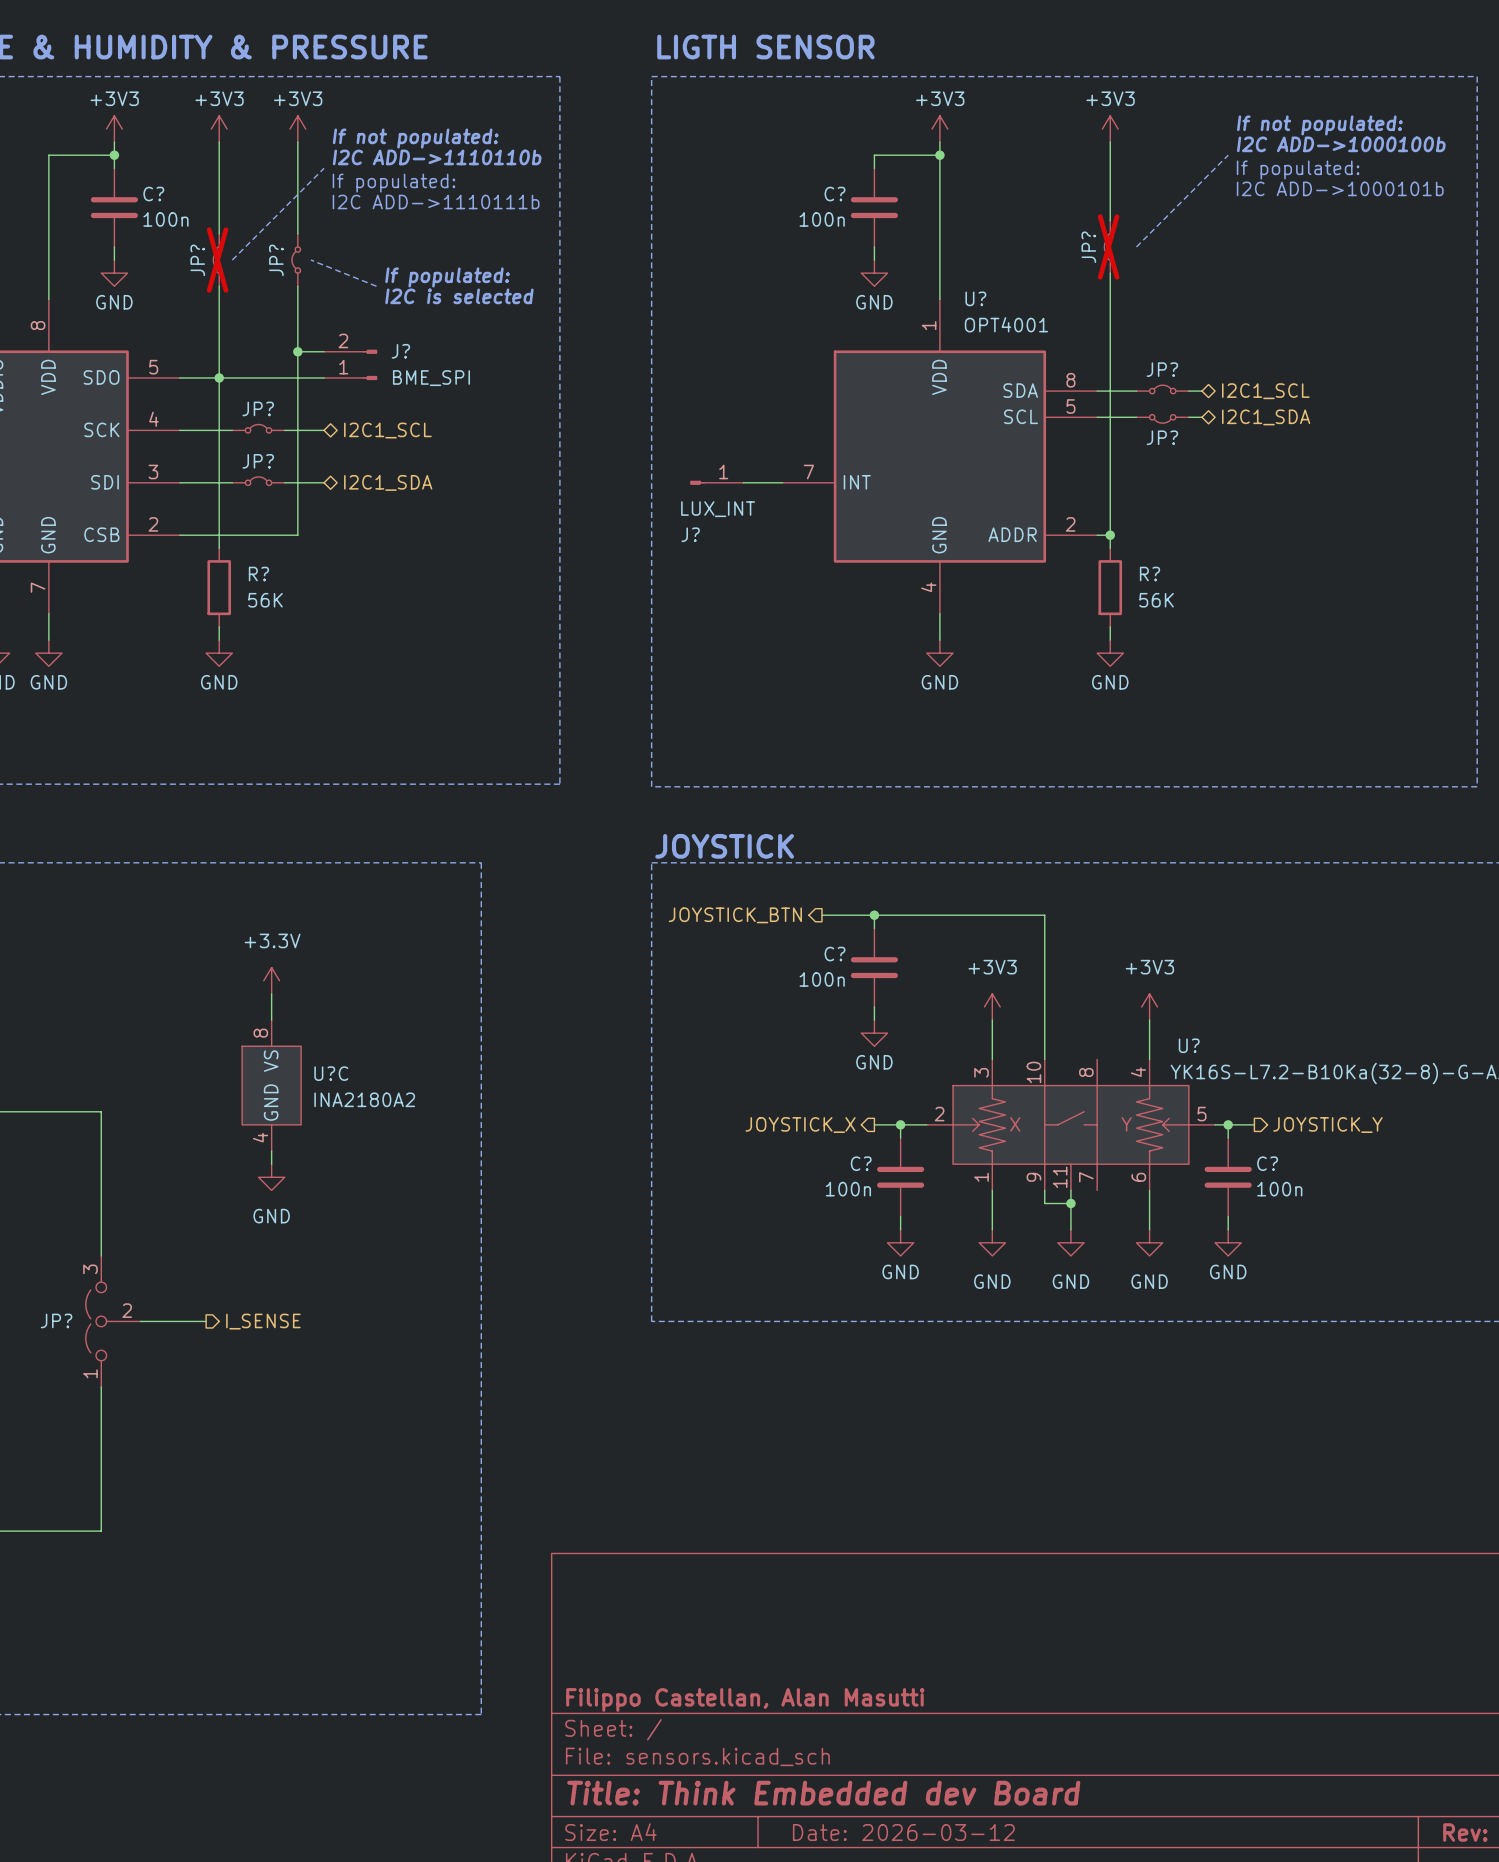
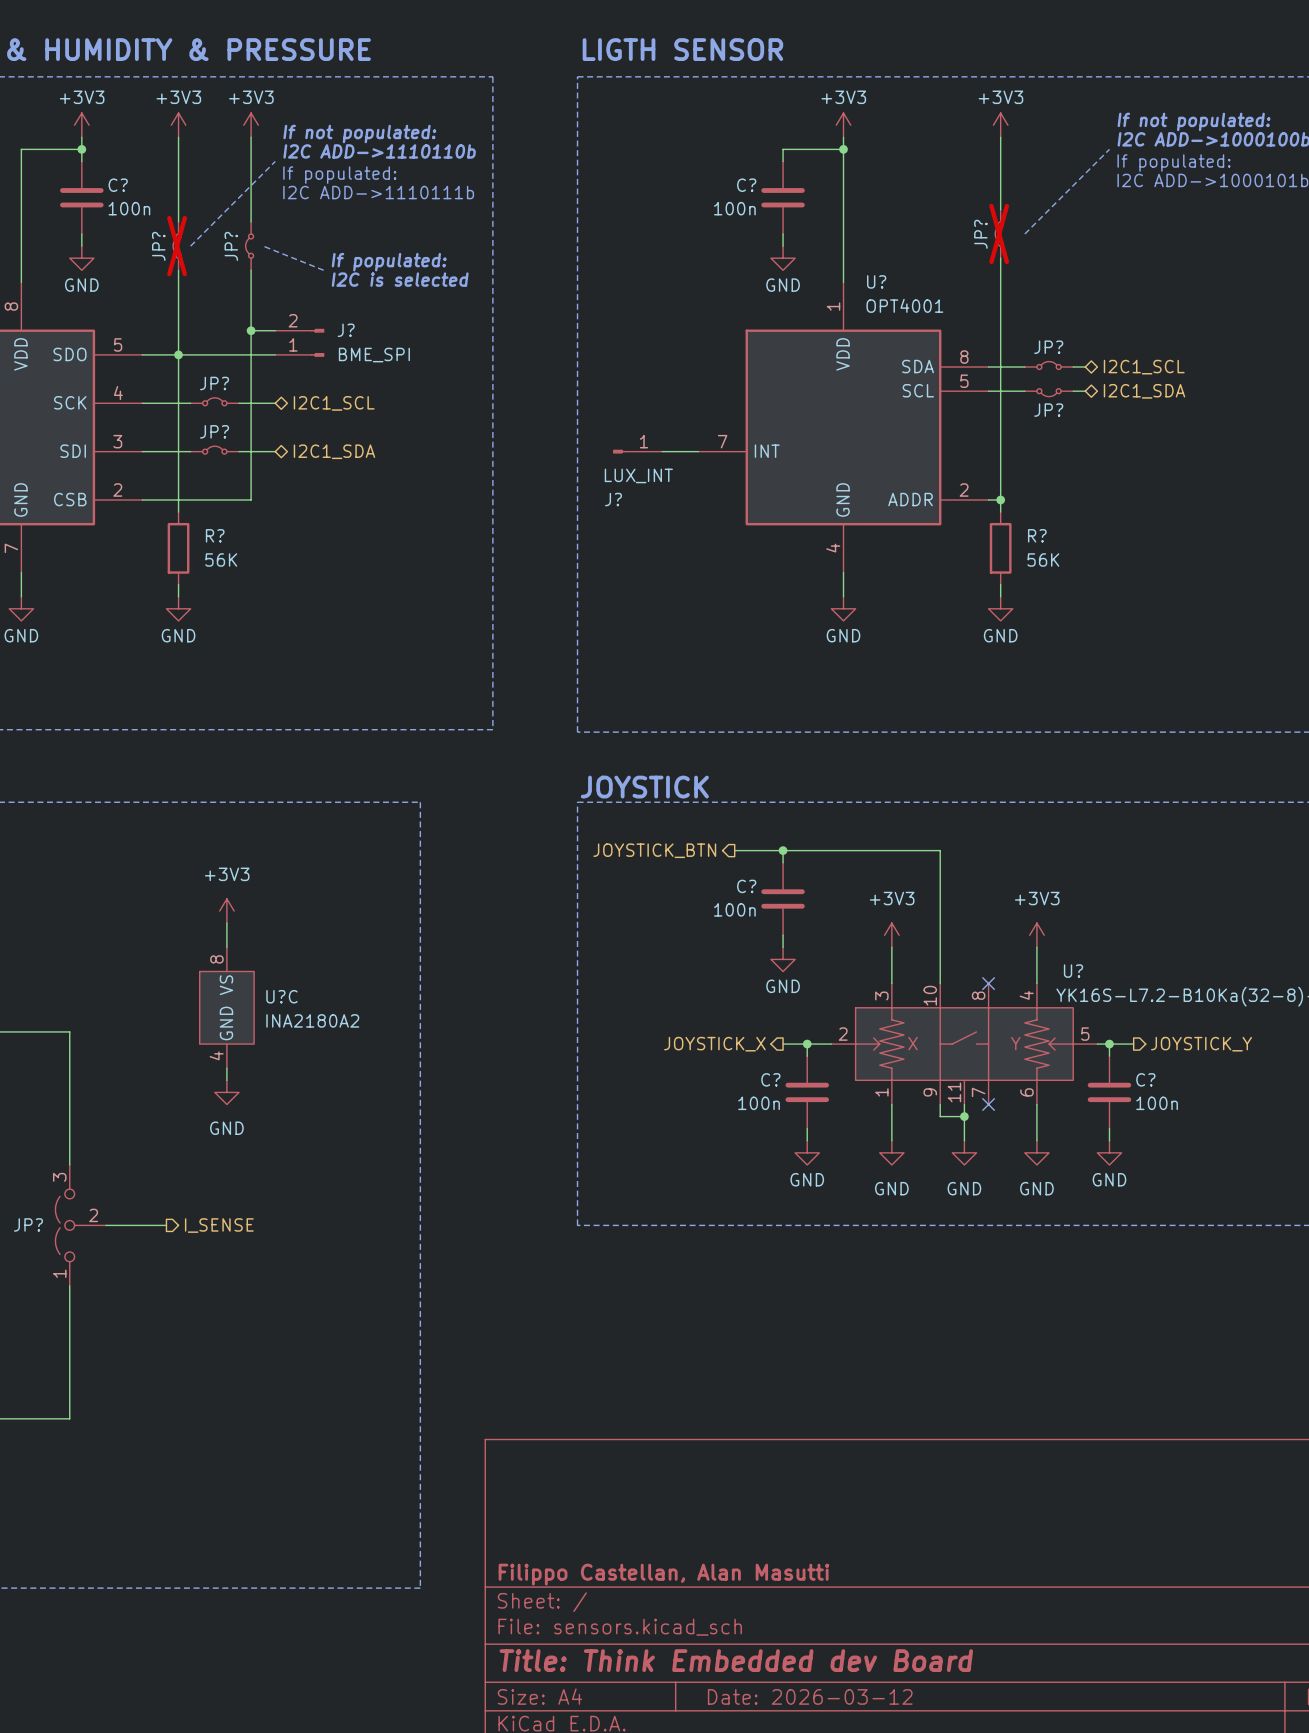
power symbol: +3.3V (271, 980) -> +3V3 (226, 911)
no-connect mark: none -> (988, 983)
no-connect mark: none -> (988, 1104)

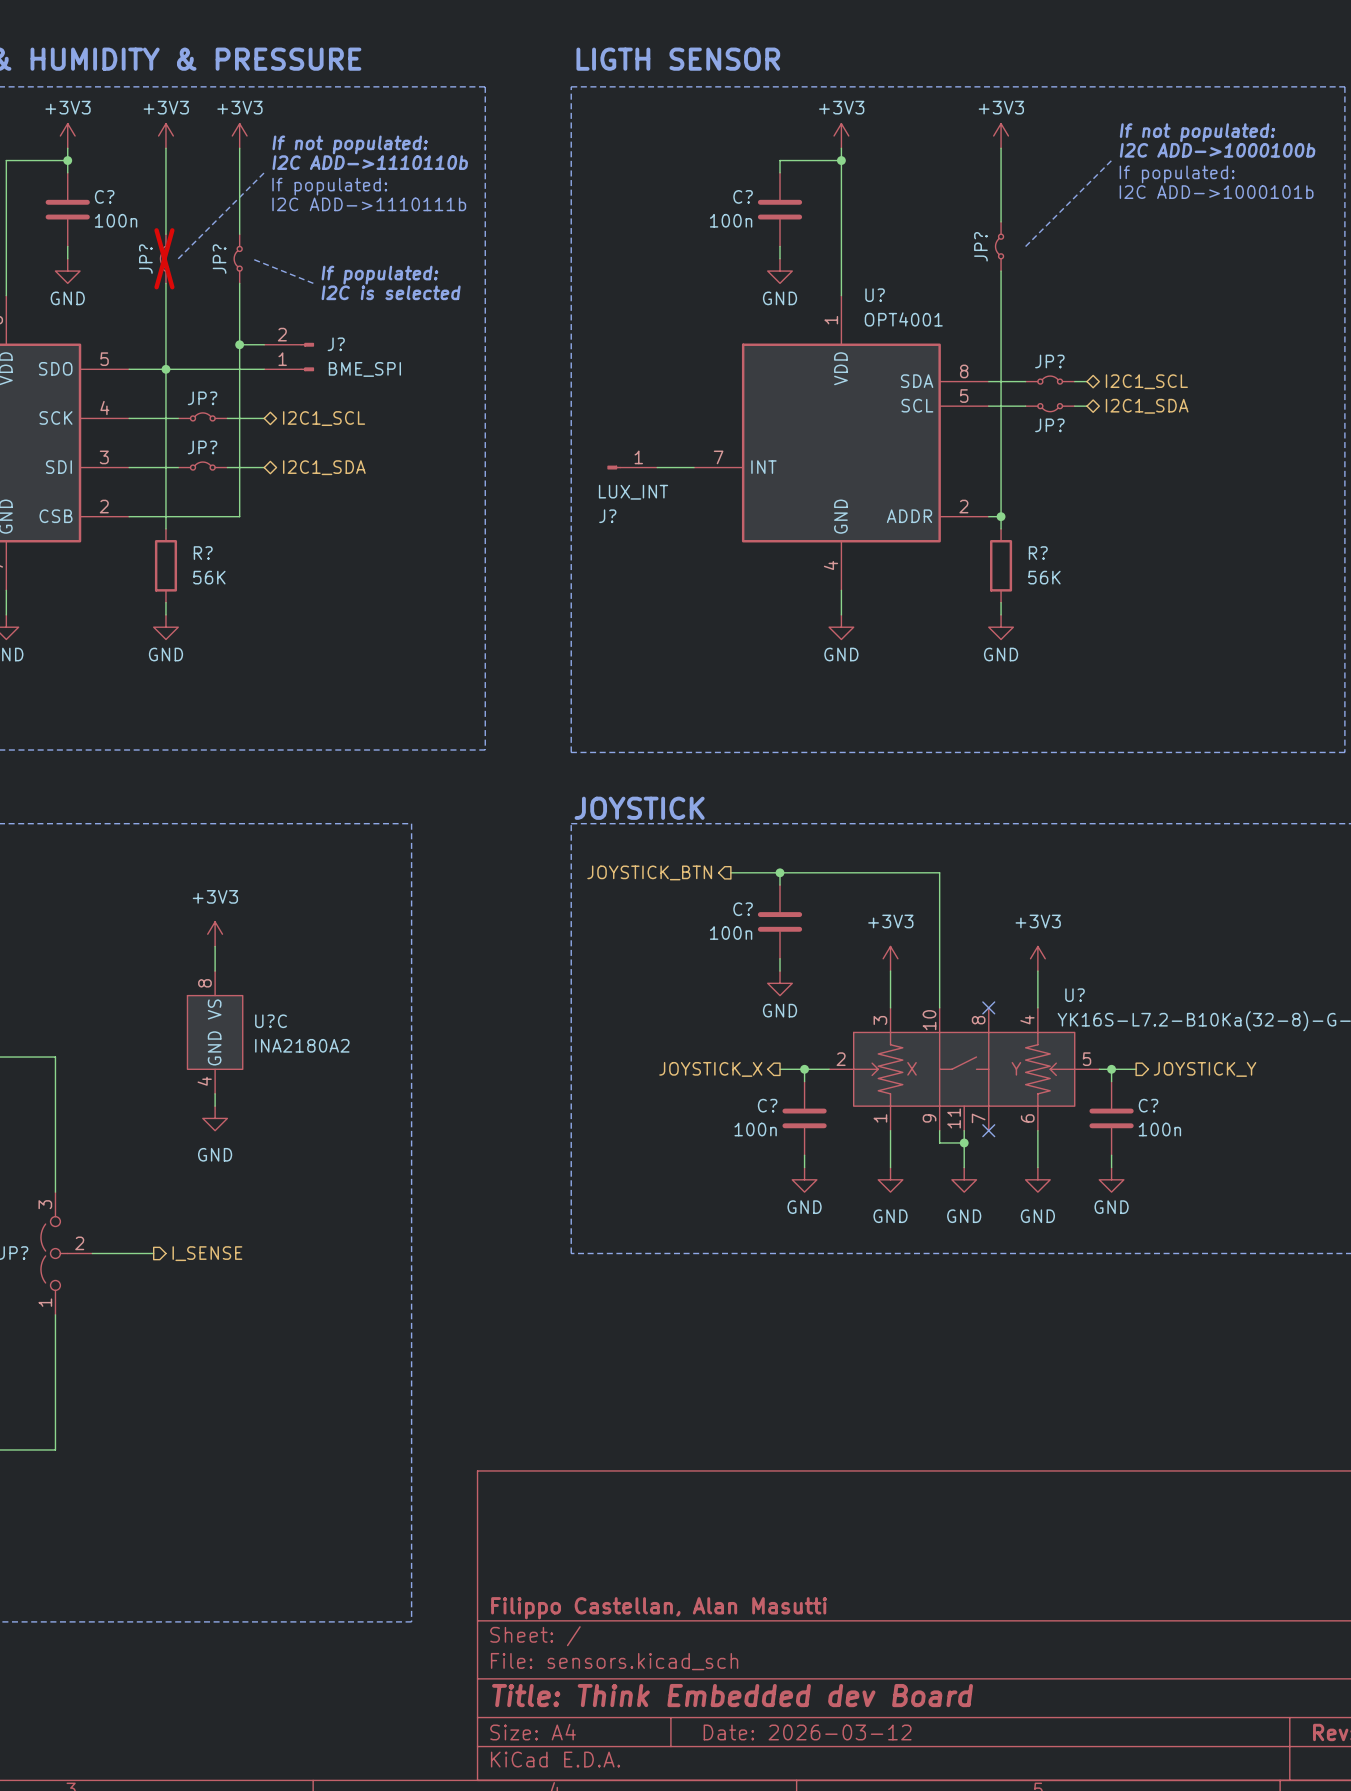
JP? do-not-place cross: (999, 234) -> none

